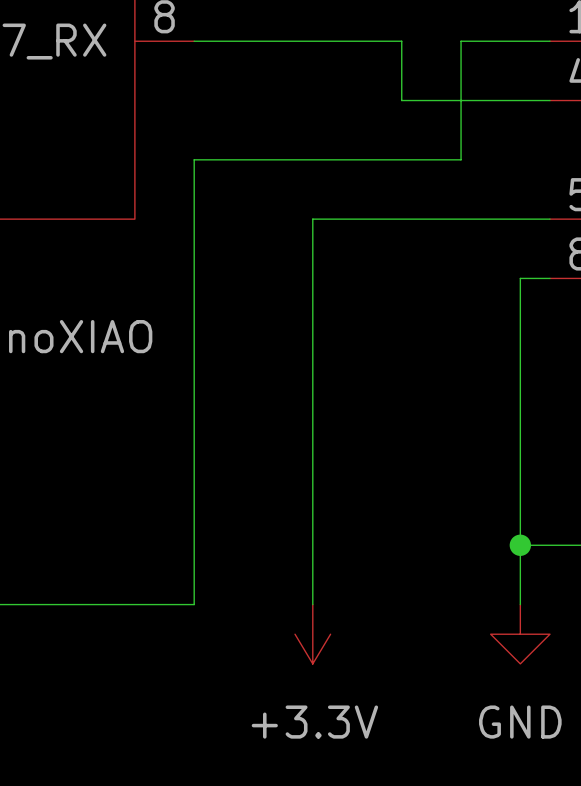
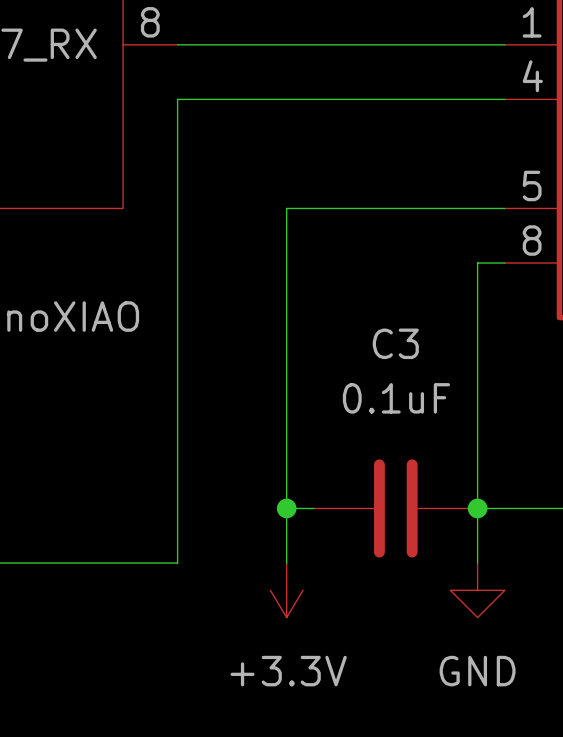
wire: (401, 41) (401, 100) -> (368, 44) (423, 44)
wire: (461, 41) (461, 159) (194, 159) -> (368, 99) (177, 99) (177, 153)
wire: none -> (286, 508) (313, 508)
junction: none -> (286, 508)
C3: none -> 0.1uF (395, 508)

